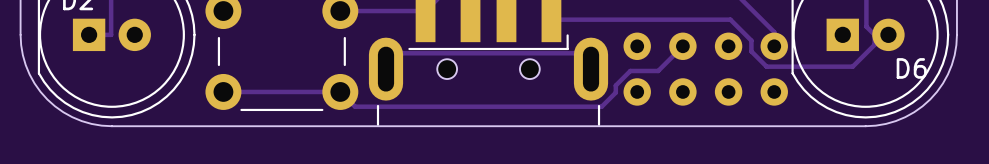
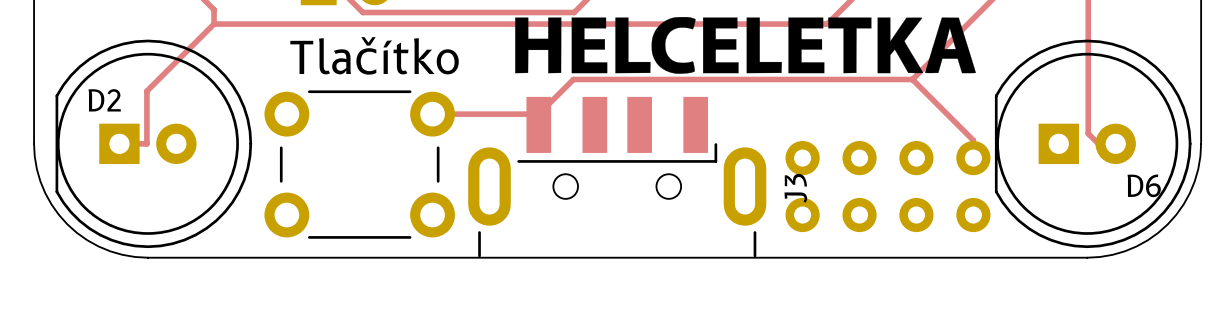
track: (551, 19) (730, 19) (751, 40) (751, 51) (766, 66) (852, 66) (874, 44) (874, 34) (888, 34) -> none
track: (682, 46) (658, 70) (630, 70) (615, 85) (615, 92) (601, 106) (355, 106) (340, 91) (223, 91) -> none
track: (386, 69) (401, 53) (575, 53) (591, 69) -> none
J3 name: none -> J3 (795, 188)

